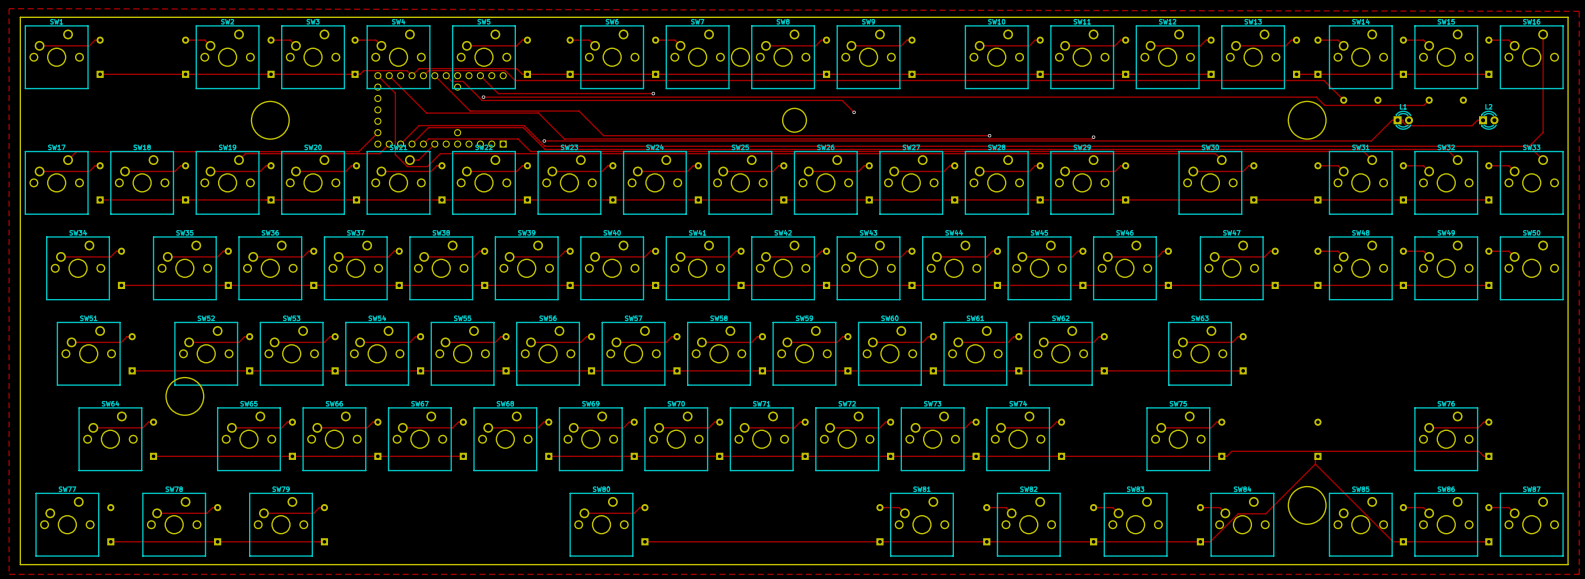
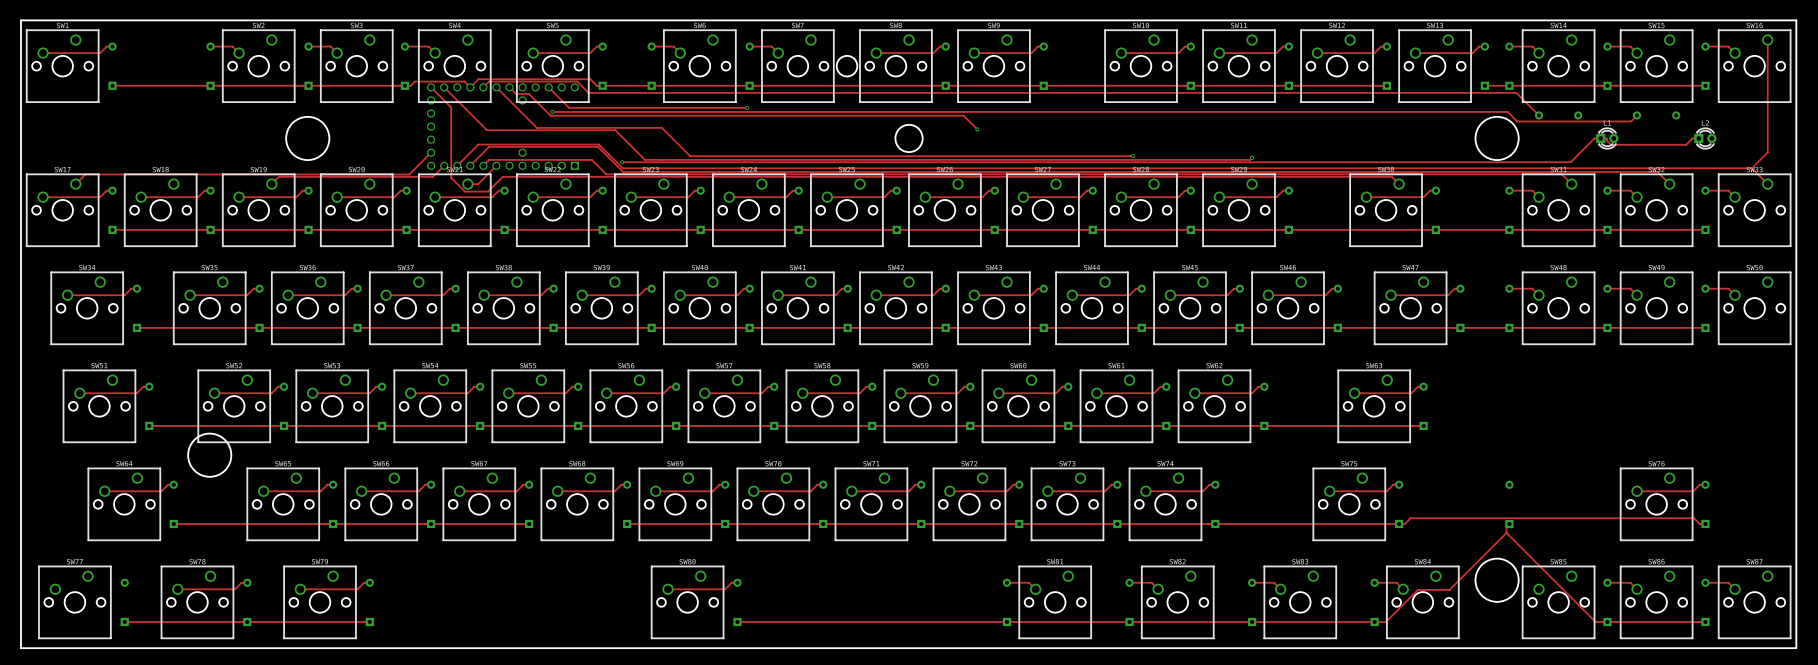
zone outline: (9, 8) (9, 574) (1579, 574) (1579, 11) (9, 8) -> none

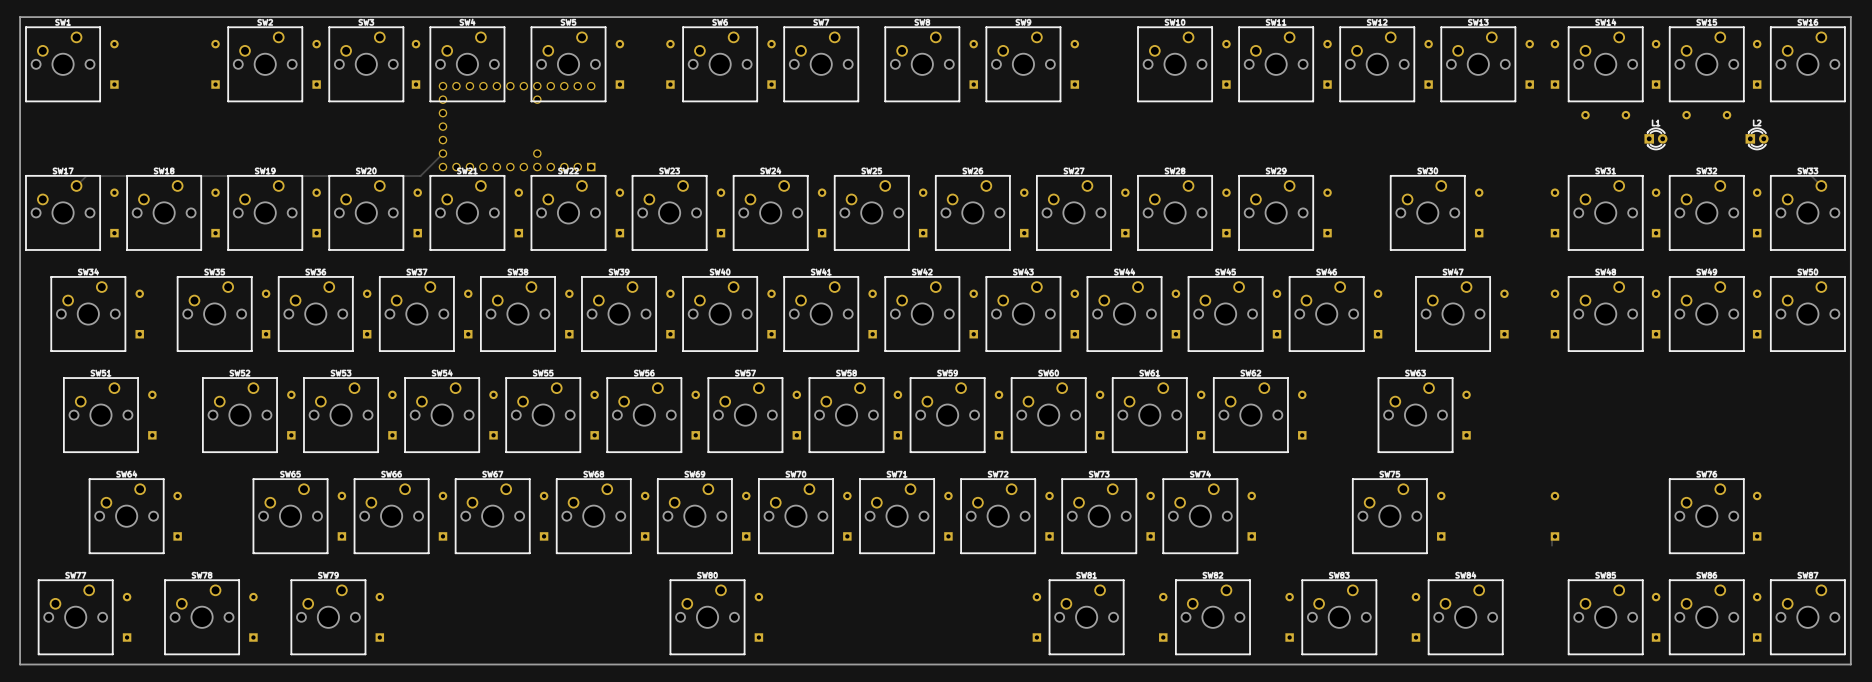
track: (1767, 40) (1767, 152) (1751, 168) (622, 168) (598, 144) (478, 144) (457, 165) -> none
track: (112, 46) (106, 46) (100, 53) (43, 53) -> none
track: (210, 46) (232, 46) (239, 53) -> none
track: (308, 46) (330, 46) (337, 53) -> none
track: (404, 46) (428, 46) (435, 53) -> none
track: (602, 46) (596, 46) (590, 53) (533, 53) -> none
track: (651, 46) (673, 46) (680, 53) -> none
track: (749, 46) (771, 46) (778, 53) -> none
track: (945, 46) (939, 46) (933, 53) (876, 53) -> none
track: (1043, 46) (1037, 46) (1031, 53) (974, 53) -> none
track: (1190, 46) (1185, 46) (1178, 53) (1121, 53) -> none
track: (1288, 46) (1283, 46) (1276, 53) (1219, 53) -> none
track: (1386, 46) (1381, 46) (1374, 53) (1317, 53) -> none
track: (1484, 46) (1479, 46) (1472, 53) (1415, 53) -> none
track: (1509, 46) (1532, 46) (1538, 53) -> none
track: (1607, 46) (1630, 46) (1637, 53) -> none
track: (1705, 46) (1728, 46) (1735, 53) -> none
round board edge: [836, 55, 858, 77] -> none
track: (112, 85) (410, 85) (414, 81) (464, 81) (470, 87) (478, 79) (590, 79) (596, 85) (1386, 85) -> none
track: (1484, 85) (1705, 85) -> none
track: (431, 87) (451, 107) (451, 177) (464, 191) (487, 191) (502, 176) (1391, 176) (1399, 184) -> none
track: (444, 87) (487, 130) (615, 130) (645, 159) (1250, 159) (1252, 157) -> none
track: (483, 87) (489, 81) (577, 81) (588, 92) (1516, 92) (1538, 115) -> none
track: (496, 87) (536, 127) (661, 127) (690, 156) (1132, 156) -> none
track: (509, 87) (516, 93) (528, 93) (550, 115) (963, 115) (977, 129) -> none
track: (548, 87) (569, 107) (747, 107) -> none
via: (747, 107) -> none
track: (552, 111) (1507, 111) (1517, 121) (1630, 121) (1637, 115) -> none
via: (552, 111) -> none
round board edge: [285, 116, 330, 161] -> none
round board edge: [1474, 116, 1520, 161] -> none
round board edge: [894, 124, 924, 153] -> none
via: (977, 129) -> none
track: (1698, 138) (1692, 138) (1686, 144) (1611, 144) (1607, 138) (1594, 138) (1570, 162) (622, 162) -> none
via: (1132, 156) -> none
via: (1252, 157) -> none
via: (622, 162) -> none
track: (444, 165) (433, 176) (279, 176) (271, 184) -> none
track: (470, 165) (489, 146) (597, 146) (623, 171) (1657, 171) (1669, 184) -> none
track: (483, 165) (489, 159) (591, 159) (606, 174) (1561, 174) (1571, 184) -> none
track: (496, 165) (478, 184) (467, 184) -> none
track: (112, 190) (106, 190) (100, 197) (43, 197) -> none
track: (210, 190) (204, 190) (198, 197) (141, 197) -> none
track: (308, 190) (302, 190) (296, 197) (239, 197) -> none
track: (406, 190) (400, 190) (394, 197) (337, 197) -> none
track: (504, 190) (498, 190) (492, 197) (435, 197) -> none
track: (602, 190) (596, 190) (590, 197) (533, 197) -> none
track: (700, 190) (694, 190) (688, 197) (631, 197) -> none
track: (798, 190) (792, 190) (786, 197) (729, 197) -> none
track: (896, 190) (890, 190) (884, 197) (827, 197) -> none
track: (994, 190) (988, 190) (982, 197) (925, 197) -> none
track: (1092, 190) (1087, 190) (1080, 197) (1023, 197) -> none
track: (1190, 190) (1185, 190) (1178, 197) (1121, 197) -> none
track: (1288, 190) (1283, 190) (1276, 197) (1219, 197) -> none
track: (1435, 190) (1430, 190) (1423, 197) (1366, 197) -> none
track: (1509, 190) (1532, 190) (1538, 197) -> none
track: (1607, 190) (1630, 190) (1637, 197) -> none
track: (1705, 190) (1728, 190) (1735, 197) -> none
track: (112, 229) (1705, 229) -> none
track: (137, 288) (131, 288) (124, 295) (67, 295) -> none
track: (259, 288) (253, 288) (247, 295) (190, 295) -> none
track: (357, 288) (351, 288) (345, 295) (288, 295) -> none
track: (455, 288) (449, 288) (443, 295) (386, 295) -> none
track: (553, 288) (547, 288) (541, 295) (484, 295) -> none
track: (651, 288) (645, 288) (639, 295) (582, 295) -> none
track: (749, 288) (743, 288) (737, 295) (680, 295) -> none
track: (847, 288) (841, 288) (835, 295) (778, 295) -> none
track: (945, 288) (939, 288) (933, 295) (876, 295) -> none
track: (1043, 288) (1037, 288) (1031, 295) (974, 295) -> none
track: (1141, 288) (1136, 288) (1129, 295) (1072, 295) -> none
track: (1239, 288) (1234, 288) (1227, 295) (1170, 295) -> none
track: (1337, 288) (1332, 288) (1325, 295) (1268, 295) -> none
track: (1460, 288) (1454, 288) (1448, 295) (1390, 295) -> none
track: (1509, 288) (1532, 288) (1538, 295) -> none
track: (1607, 288) (1630, 288) (1637, 295) -> none
track: (1705, 288) (1728, 288) (1735, 295) -> none
track: (137, 327) (1705, 327) -> none
track: (149, 386) (143, 386) (136, 393) (79, 393) -> none
track: (284, 386) (278, 386) (271, 393) (214, 393) -> none
track: (382, 386) (376, 386) (369, 393) (312, 393) -> none
track: (480, 386) (474, 386) (467, 393) (410, 393) -> none
track: (578, 386) (572, 386) (565, 393) (508, 393) -> none
track: (676, 386) (670, 386) (663, 393) (606, 393) -> none
track: (774, 386) (768, 386) (761, 393) (704, 393) -> none
track: (872, 386) (866, 386) (859, 393) (802, 393) -> none
track: (970, 386) (964, 386) (957, 393) (900, 393) -> none
track: (1068, 386) (1062, 386) (1055, 393) (998, 393) -> none
track: (1166, 386) (1160, 386) (1153, 393) (1096, 393) -> none
track: (1264, 386) (1258, 386) (1252, 393) (1194, 393) -> none
track: (1423, 386) (1417, 386) (1411, 393) (1354, 393) -> none
track: (149, 425) (1423, 425) -> none
round board edge: [187, 433, 232, 478] -> none
track: (173, 484) (167, 484) (161, 491) (104, 491) -> none
track: (333, 484) (327, 484) (320, 491) (263, 491) -> none
track: (431, 484) (425, 484) (418, 491) (361, 491) -> none
track: (529, 484) (523, 484) (516, 491) (459, 491) -> none
track: (627, 484) (621, 484) (614, 491) (557, 491) -> none
track: (725, 484) (719, 484) (712, 491) (655, 491) -> none
track: (823, 484) (817, 484) (810, 491) (753, 491) -> none
track: (921, 484) (915, 484) (908, 491) (851, 491) -> none
track: (1019, 484) (1013, 484) (1006, 491) (949, 491) -> none
track: (1117, 484) (1111, 484) (1104, 491) (1047, 491) -> none
track: (1215, 484) (1209, 484) (1203, 491) (1145, 491) -> none
track: (1399, 484) (1393, 484) (1386, 491) (1329, 491) -> none
track: (1705, 484) (1699, 484) (1693, 491) (1637, 491) -> none
track: (173, 523) (529, 523) -> none
track: (627, 523) (1404, 523) (1410, 518) (1693, 518) (1699, 523) (1705, 523) -> none
round board edge: [1474, 558, 1520, 603] -> none
track: (247, 582) (241, 582) (234, 589) (177, 589) -> none
track: (369, 582) (364, 582) (357, 589) (300, 589) -> none
track: (737, 582) (731, 582) (725, 589) (668, 589) -> none
track: (1007, 582) (1029, 582) (1035, 589) -> none
track: (1129, 582) (1151, 582) (1158, 589) -> none
track: (1252, 582) (1274, 582) (1280, 589) -> none
track: (1374, 582) (1396, 582) (1403, 589) -> none
track: (1607, 582) (1630, 582) (1637, 589) -> none
track: (1705, 582) (1728, 582) (1735, 589) -> none
track: (124, 621) (369, 621) -> none
track: (737, 621) (1385, 621) (1418, 589) (1449, 589) (1506, 532) (1595, 621) (1705, 621) -> none

